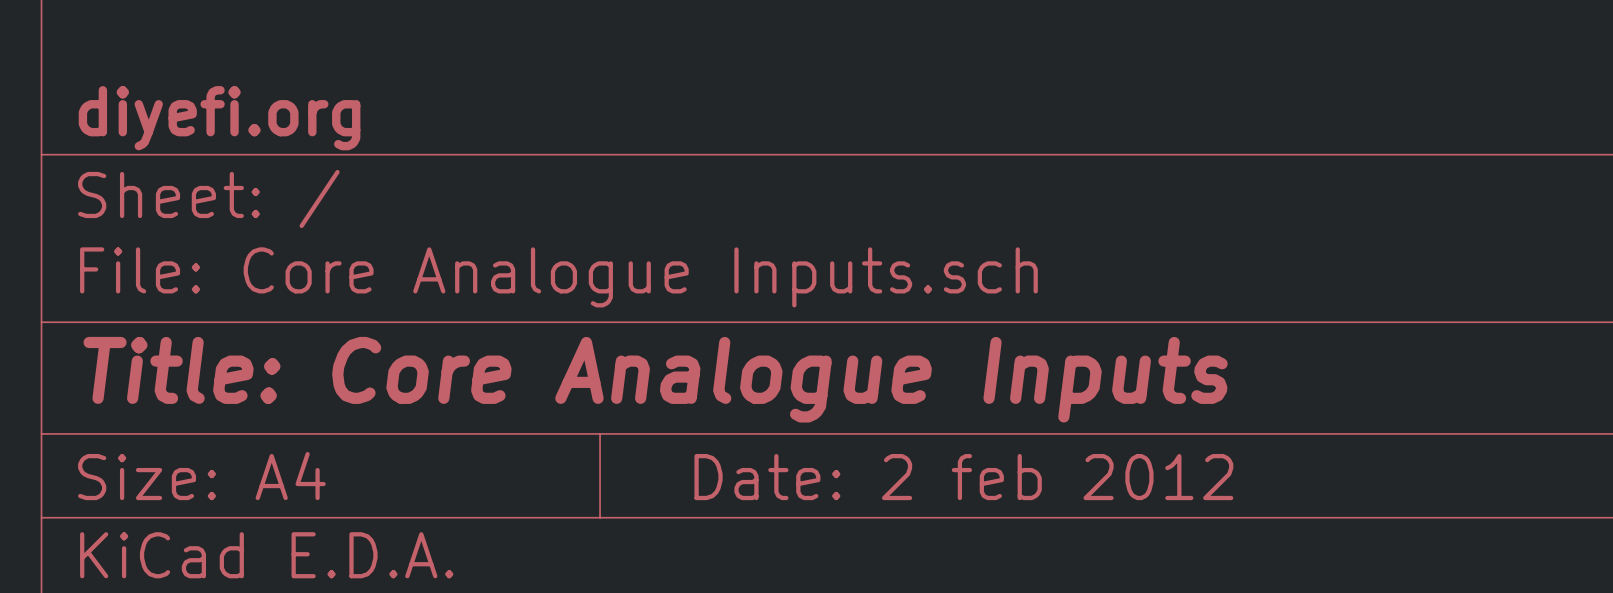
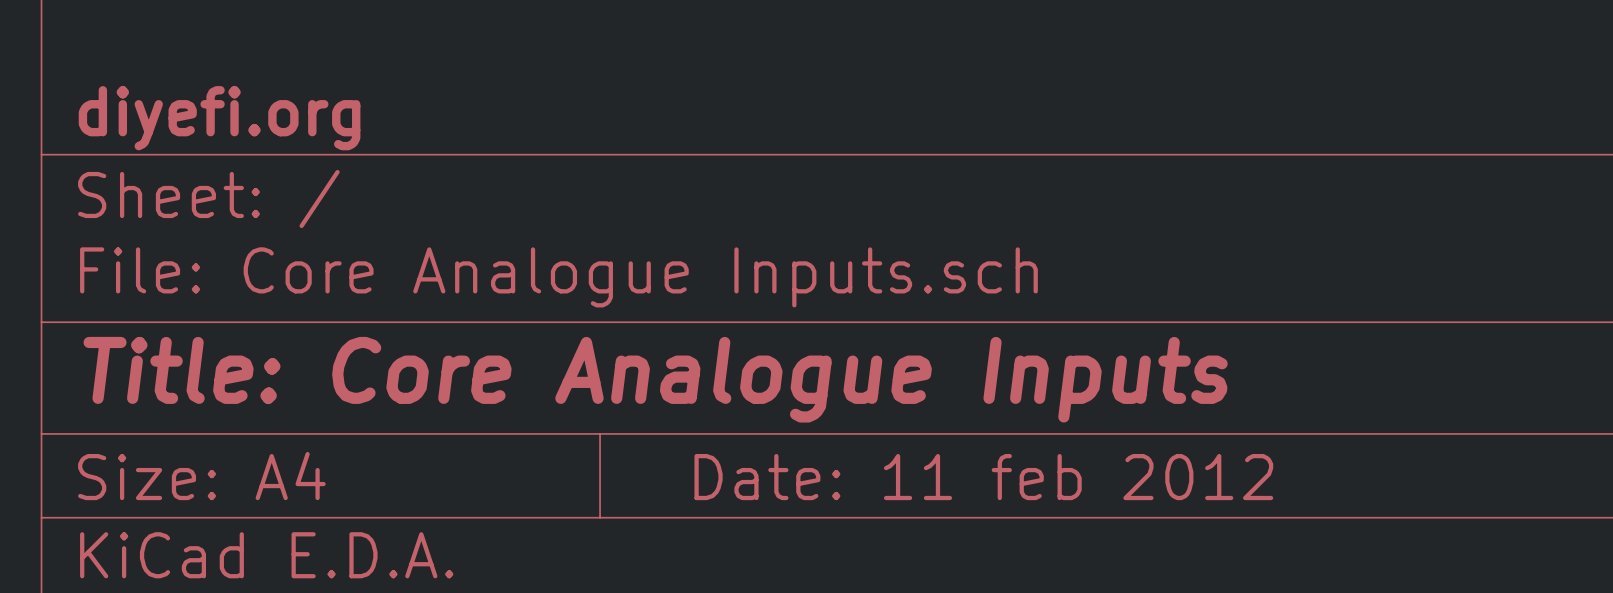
title block: Date: 2 feb 2012 (963, 477) -> Date: 11 feb 2012 (983, 477)

